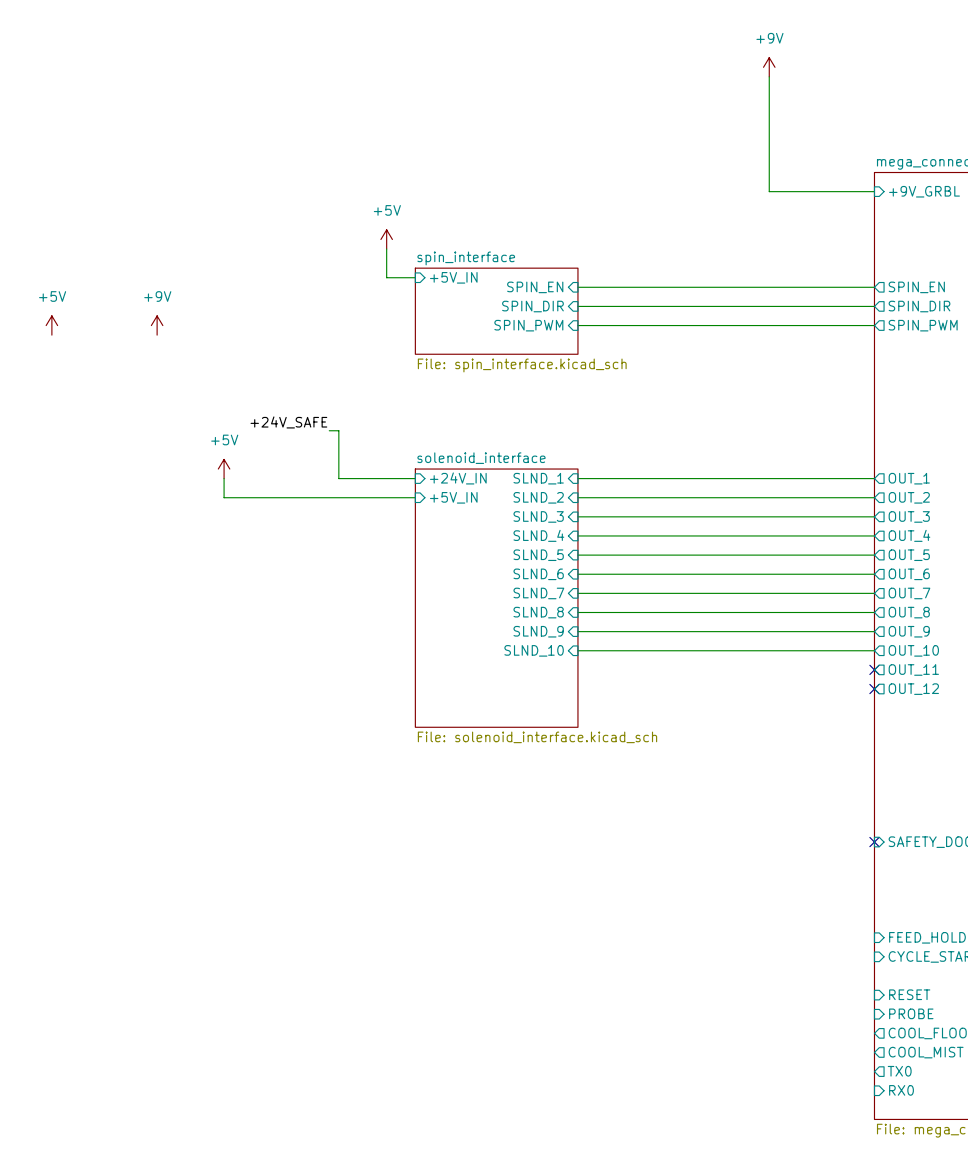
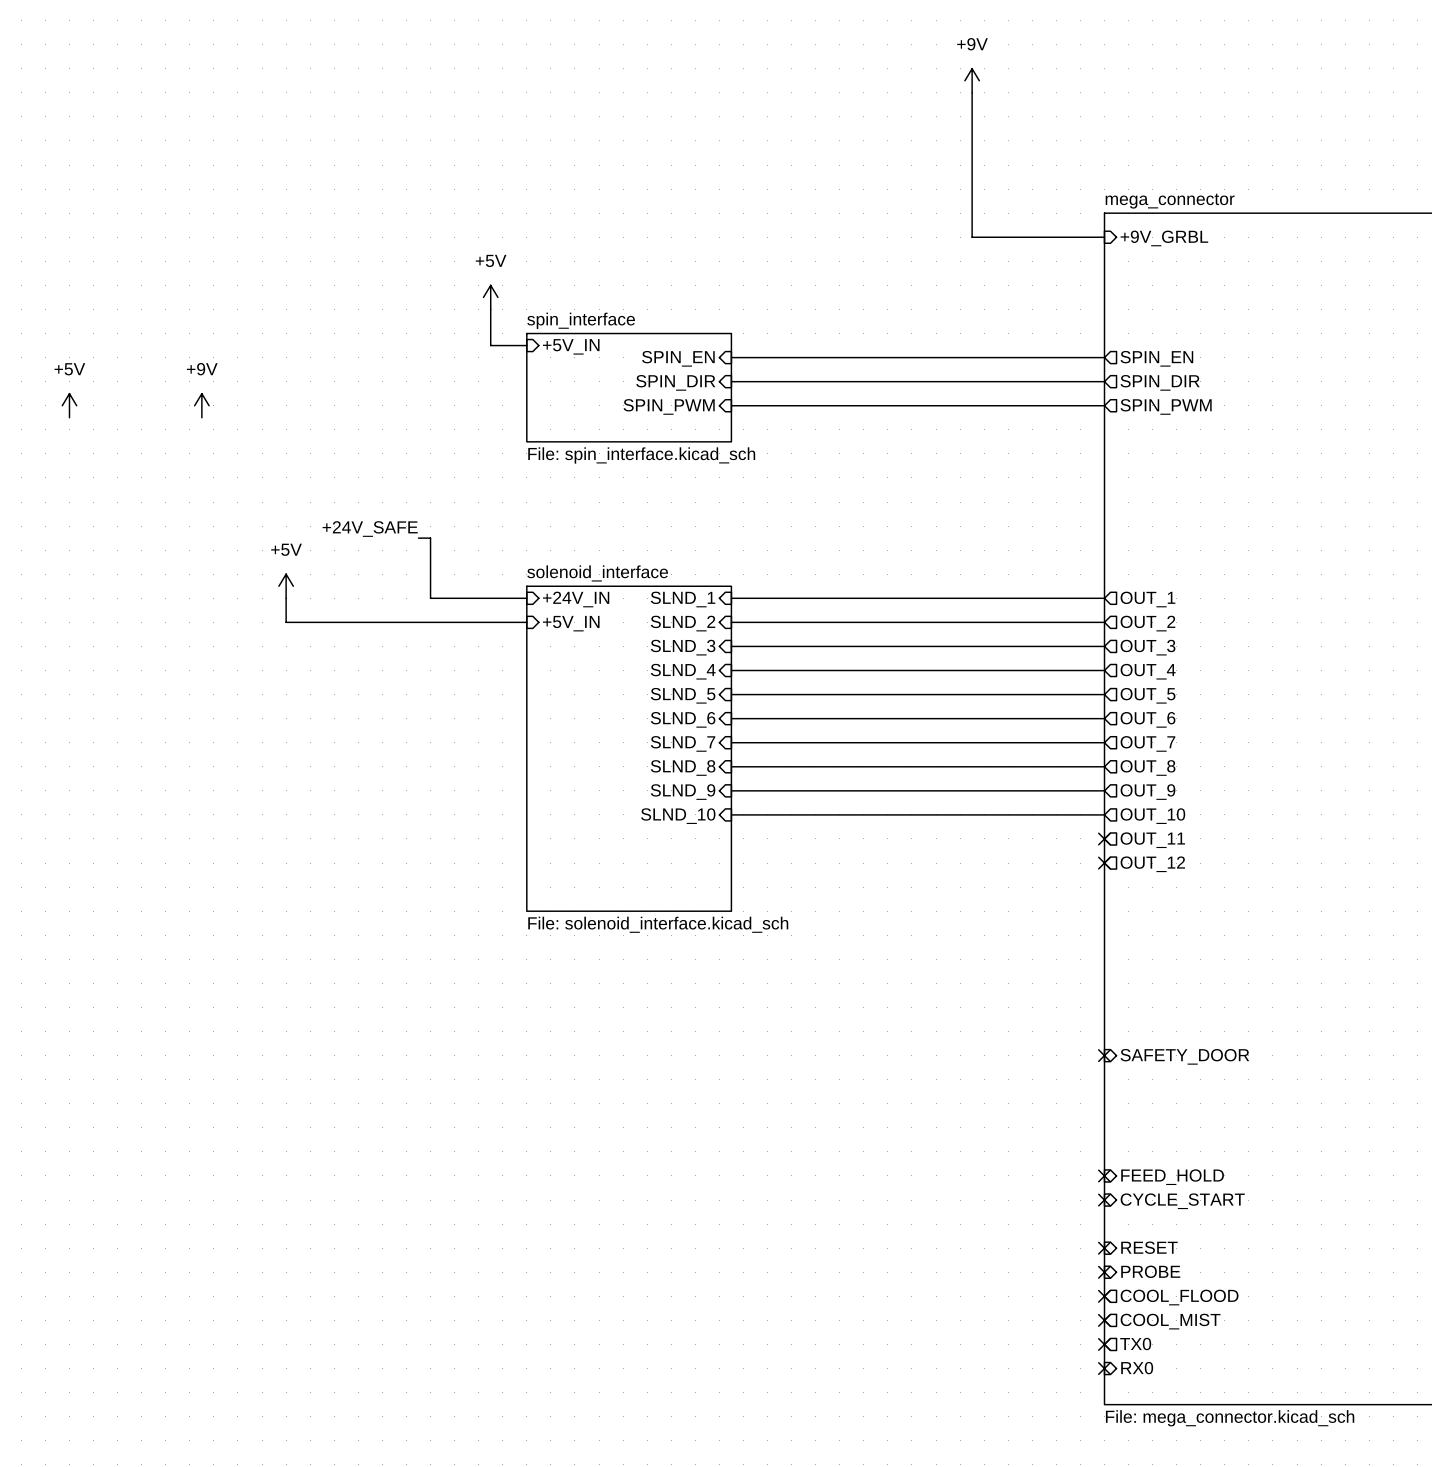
no-connect mark: none -> (1104, 1175)
no-connect mark: none -> (1104, 1200)
no-connect mark: none -> (1104, 1248)
no-connect mark: none -> (1104, 1272)
no-connect mark: none -> (1104, 1296)
no-connect mark: none -> (1104, 1320)
no-connect mark: none -> (1104, 1344)
no-connect mark: none -> (1104, 1368)

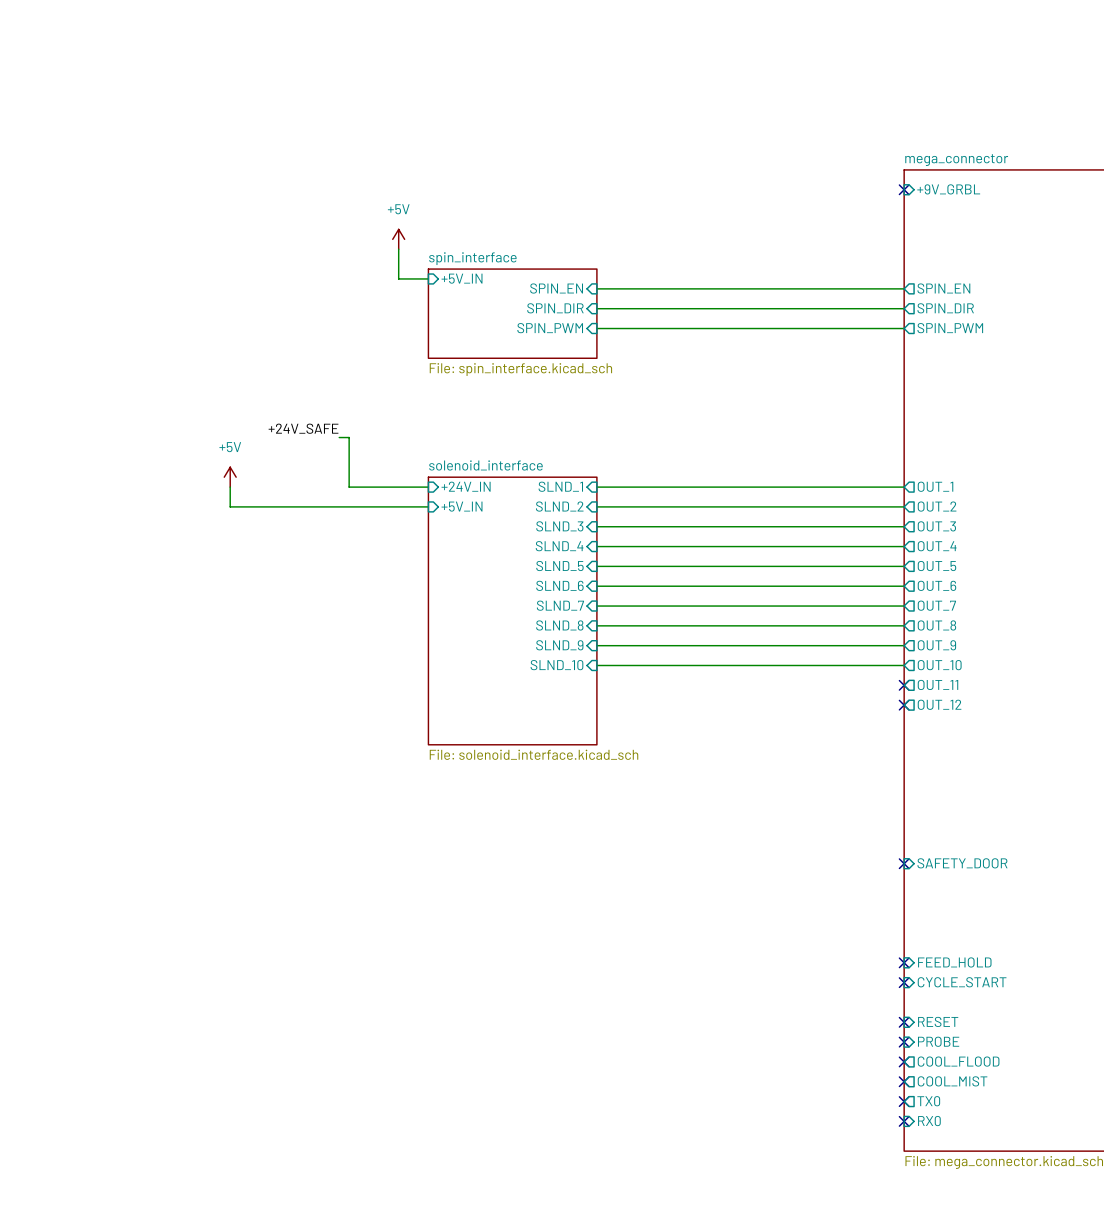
power symbol: +9V (972, 80) -> none
wire: (972, 92) (972, 237) (1104, 237) -> none
no-connect mark: none -> (904, 189)
power symbol: +5V (69, 405) -> none
power symbol: +9V (201, 405) -> none

